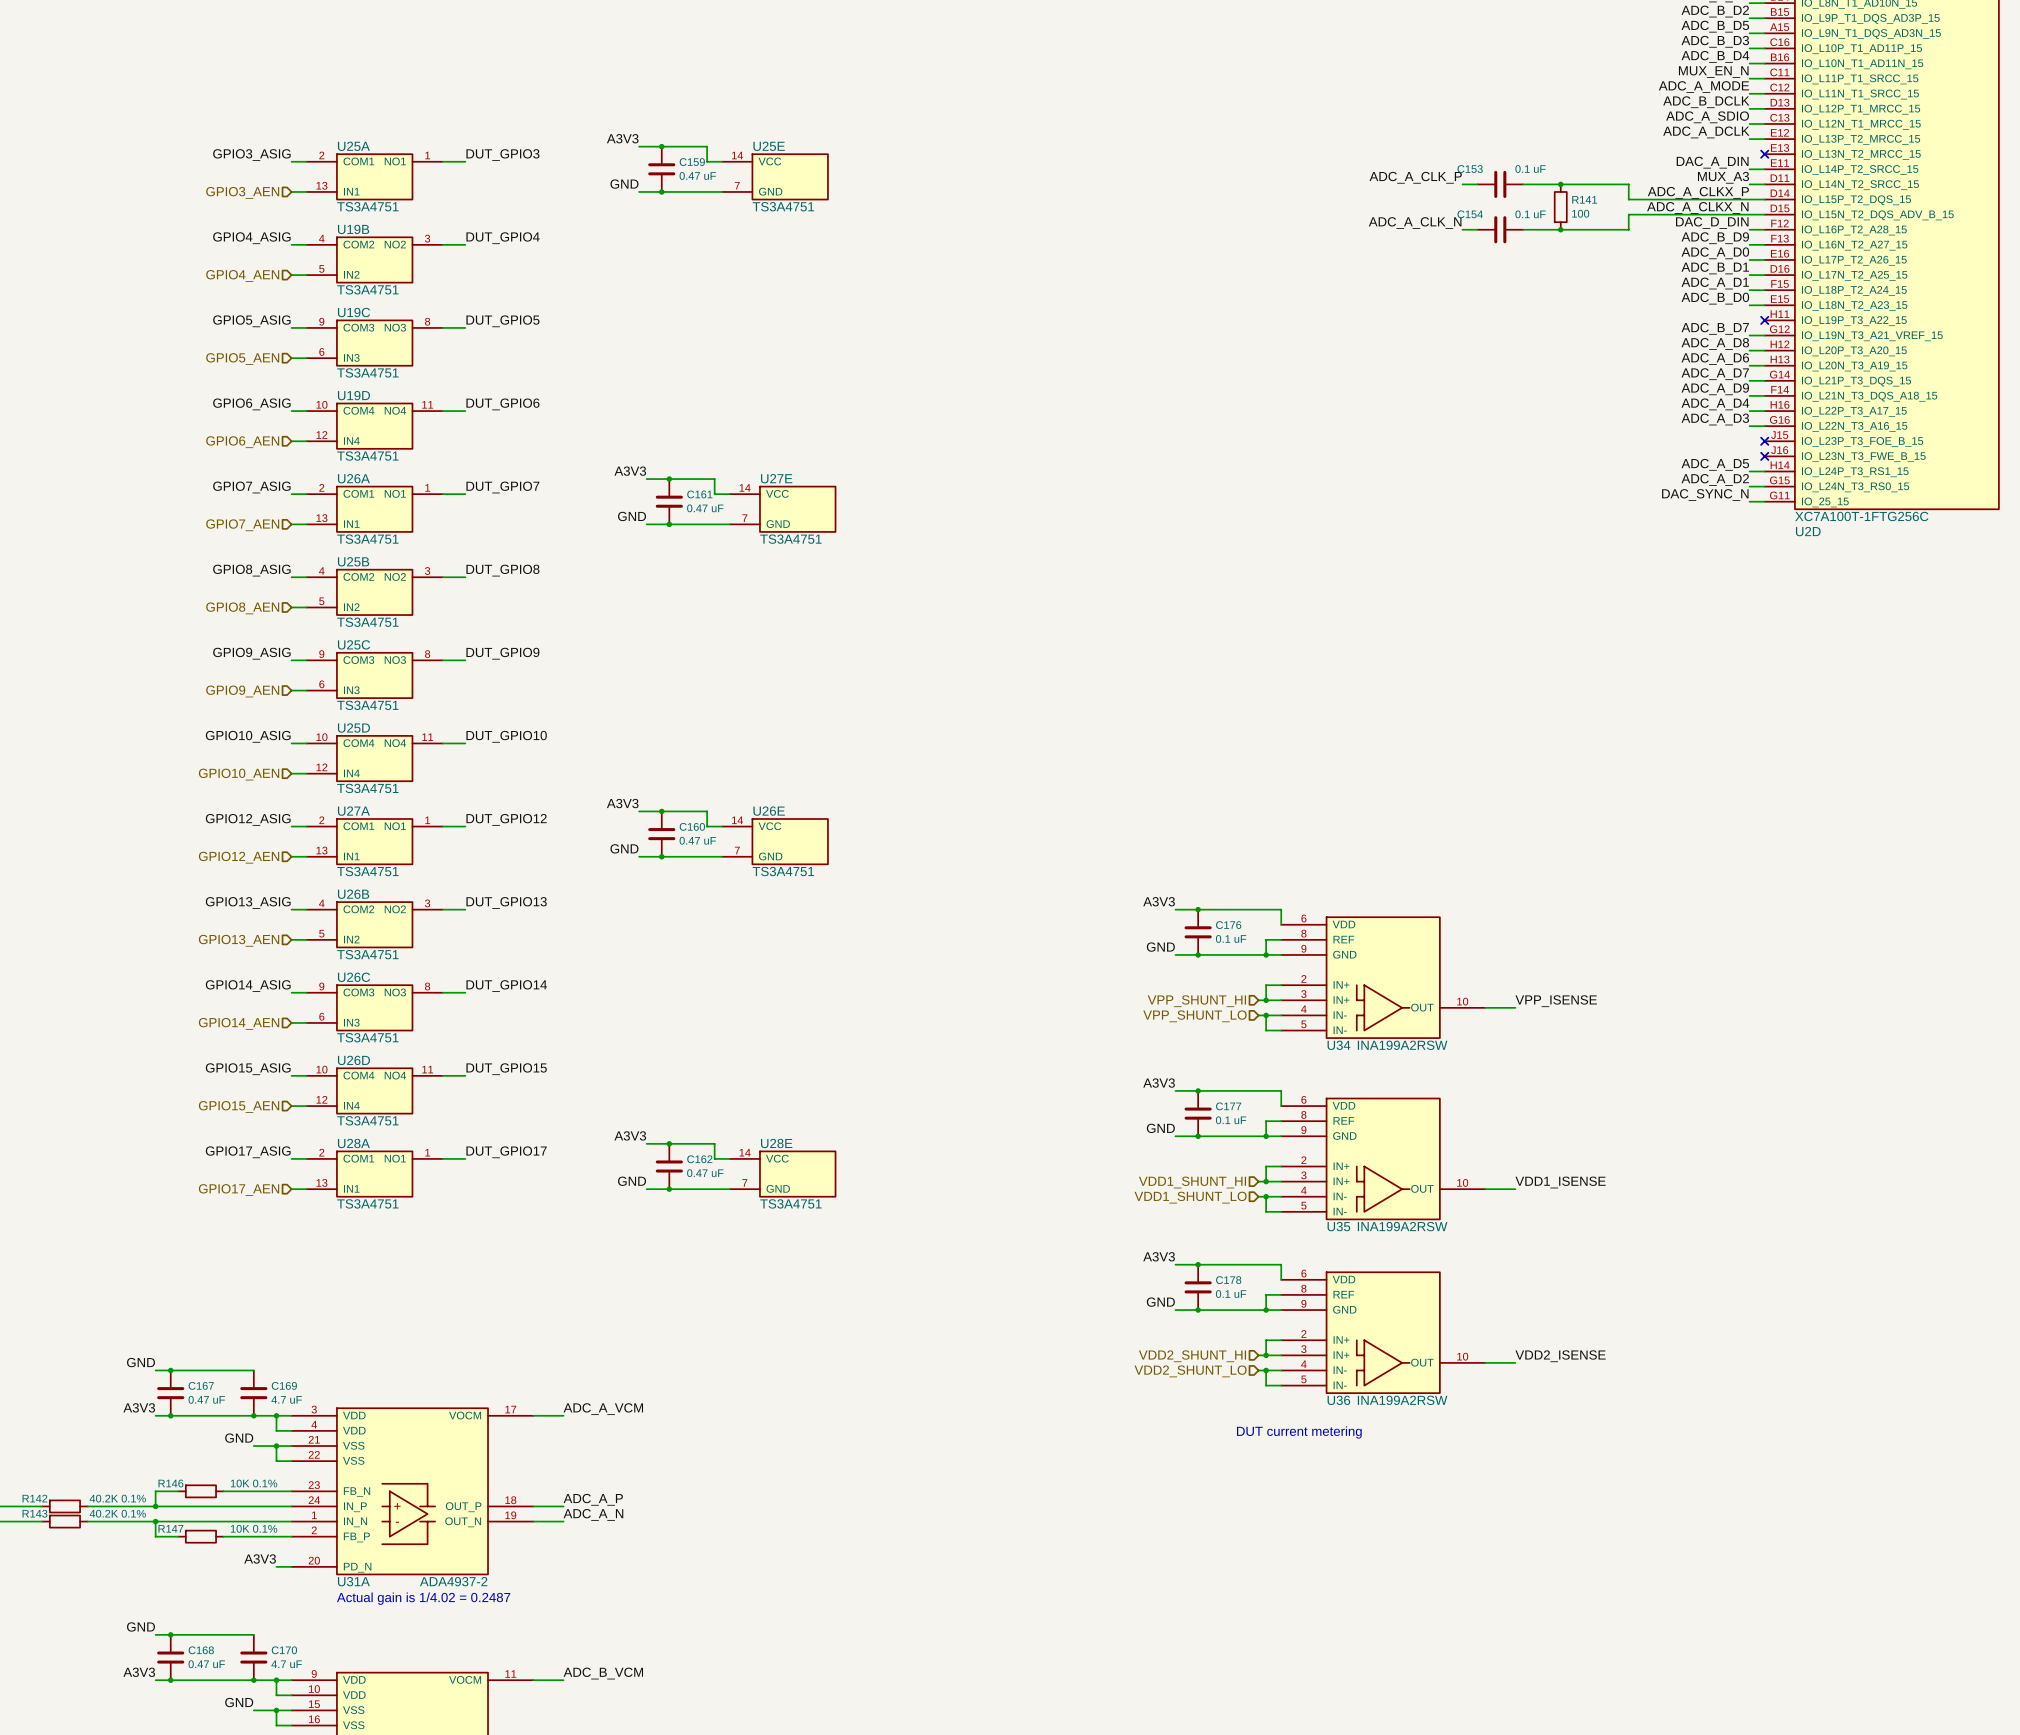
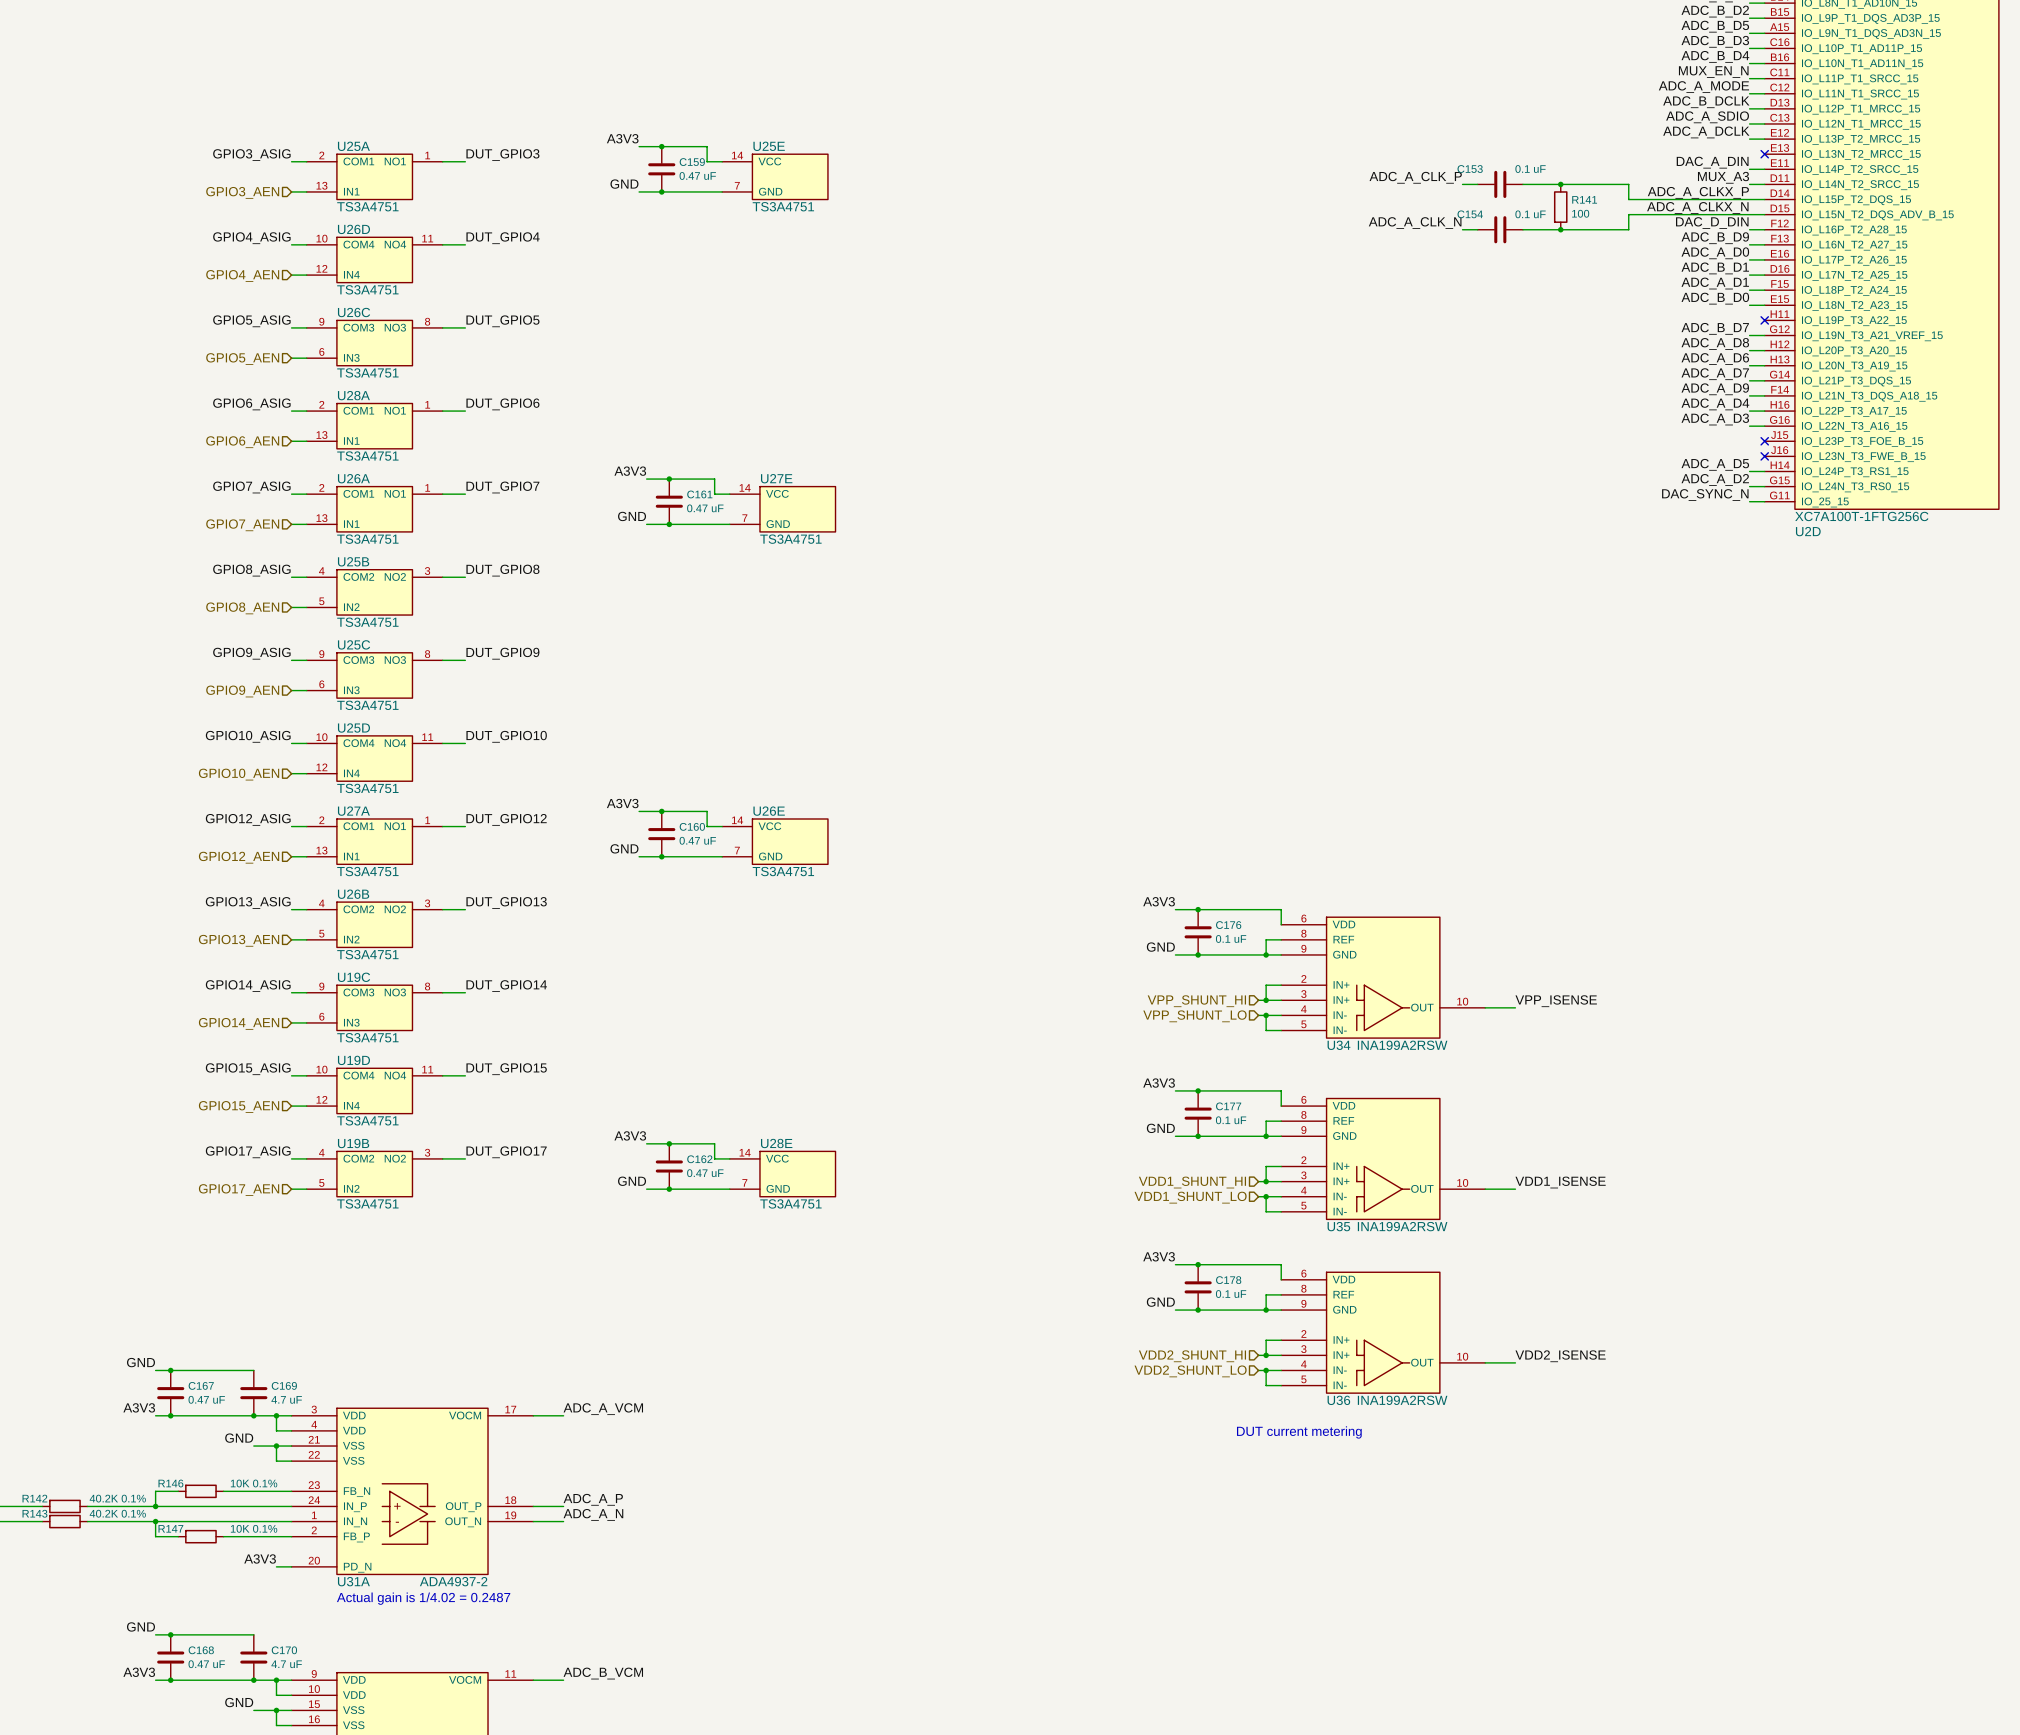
U19B position: (374, 259) -> (374, 1174)
U26D: none -> TS3A4751 (374, 259)
U19C name: U19C (354, 312) -> U26C (354, 312)
U19D: TS3A4751 (374, 426) -> none
U26C name: U26C (354, 977) -> U19C (354, 977)
U26D name: U26D (353, 1060) -> U19D (353, 1060)
U28A position: (374, 1174) -> (374, 426)

